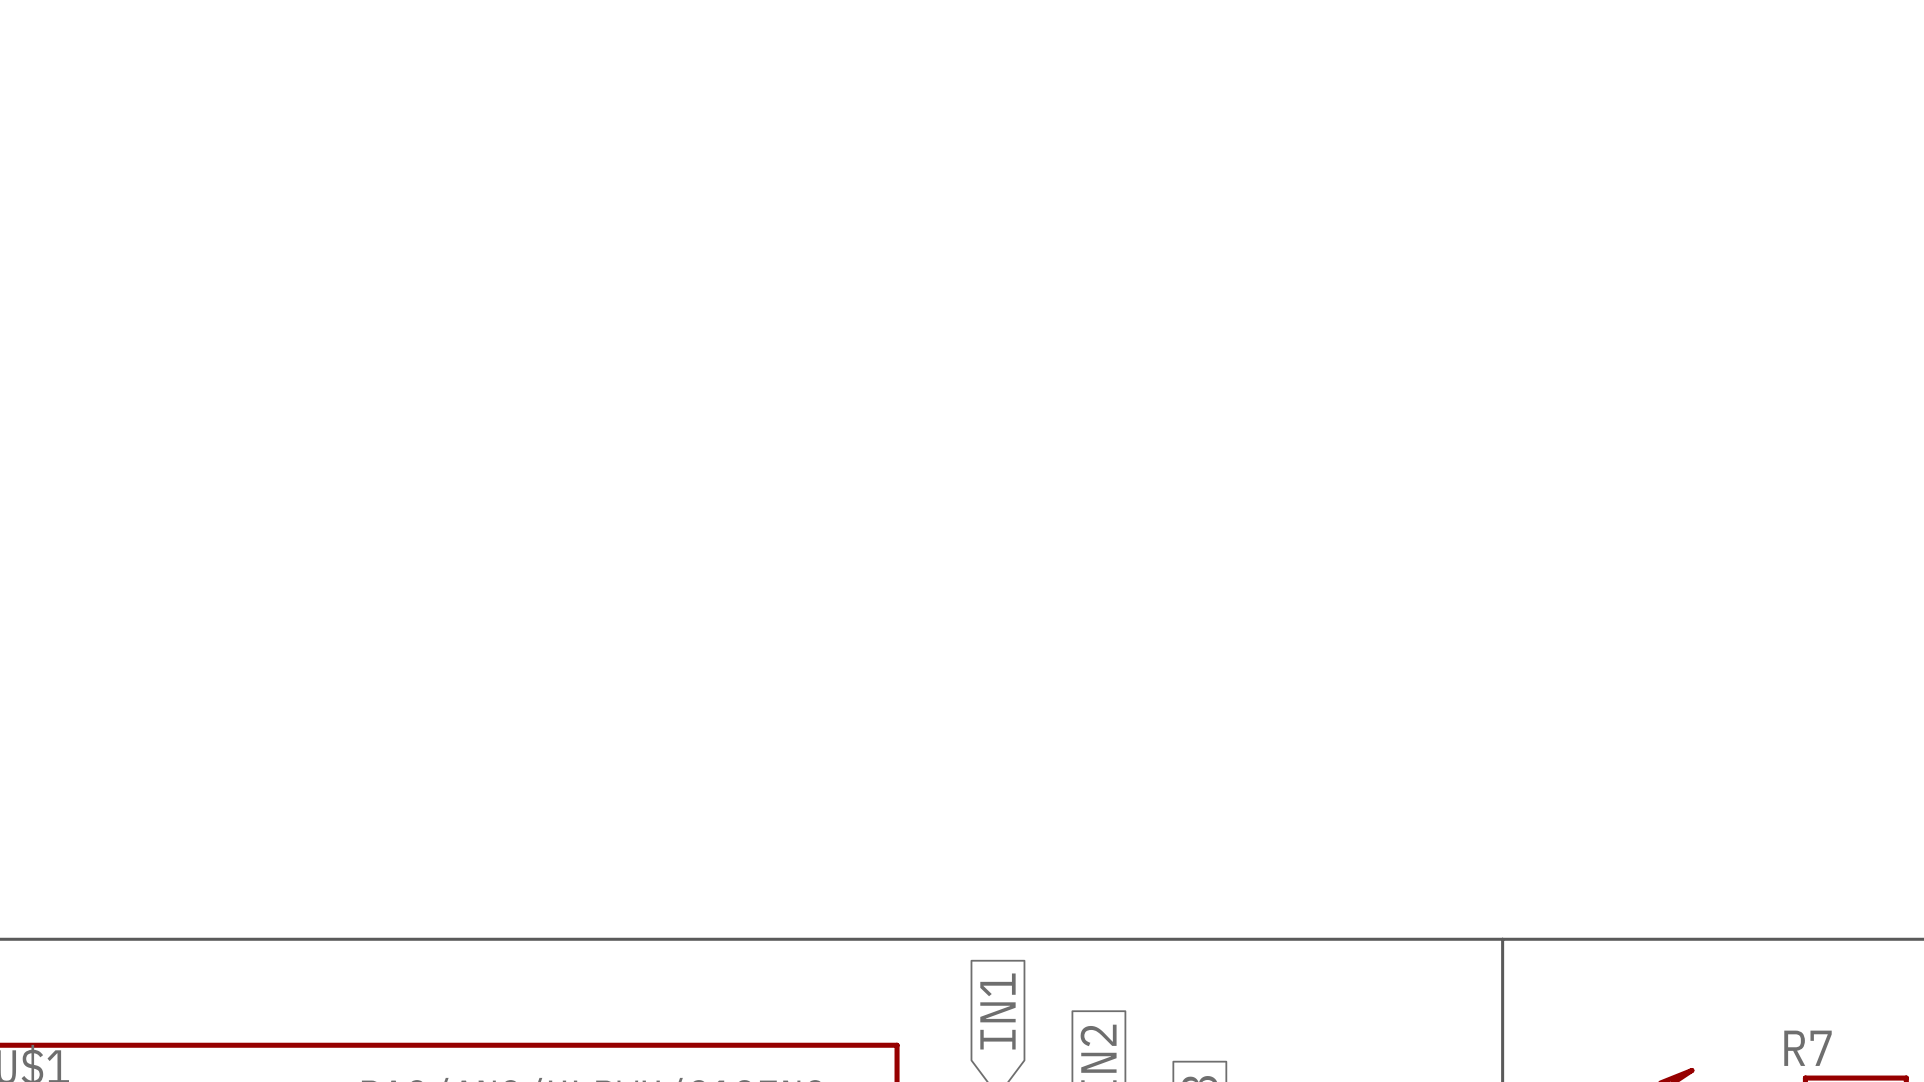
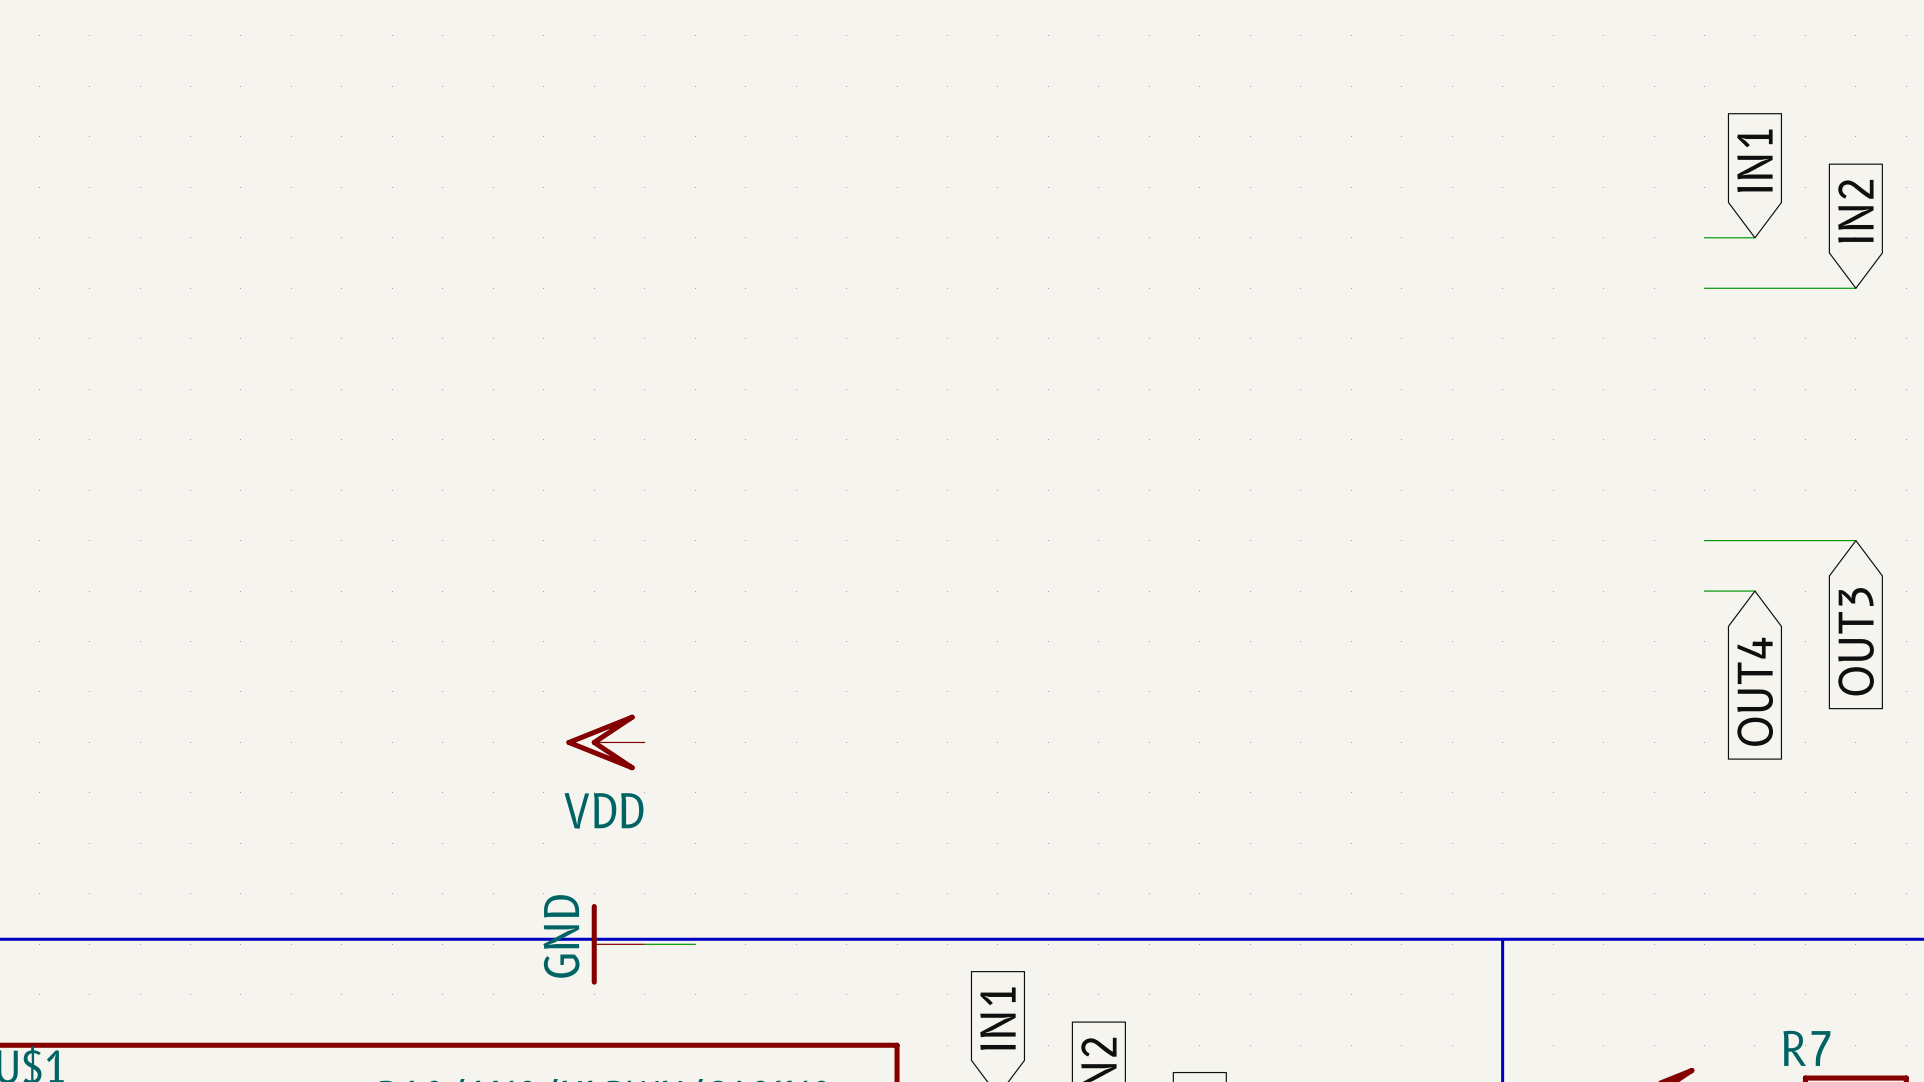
global label: none -> IN1 (1754, 160)
global label: none -> IN2 (1855, 211)
wire: none -> (1704, 237) (1754, 237)
wire: none -> (1704, 288) (1855, 288)
wire: none -> (1704, 540) (1855, 540)
wire: none -> (1704, 591) (1754, 591)
global label: none -> OUT3 (1856, 641)
global label: none -> OUT4 (1755, 691)
power symbol: none -> VDD (605, 742)
power symbol: none -> GND (618, 944)
wire: none -> (644, 944) (695, 944)

